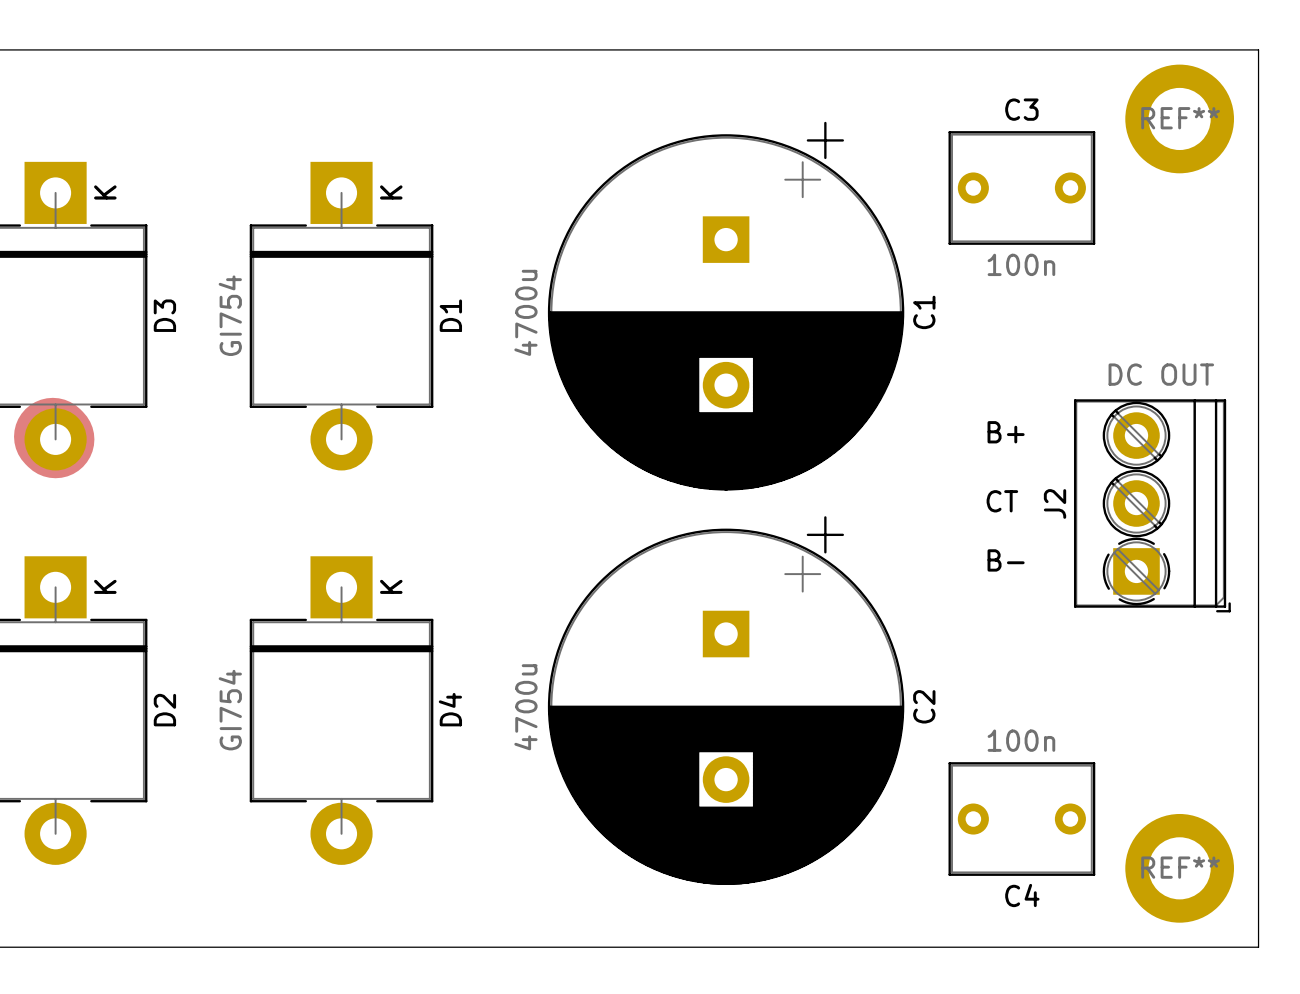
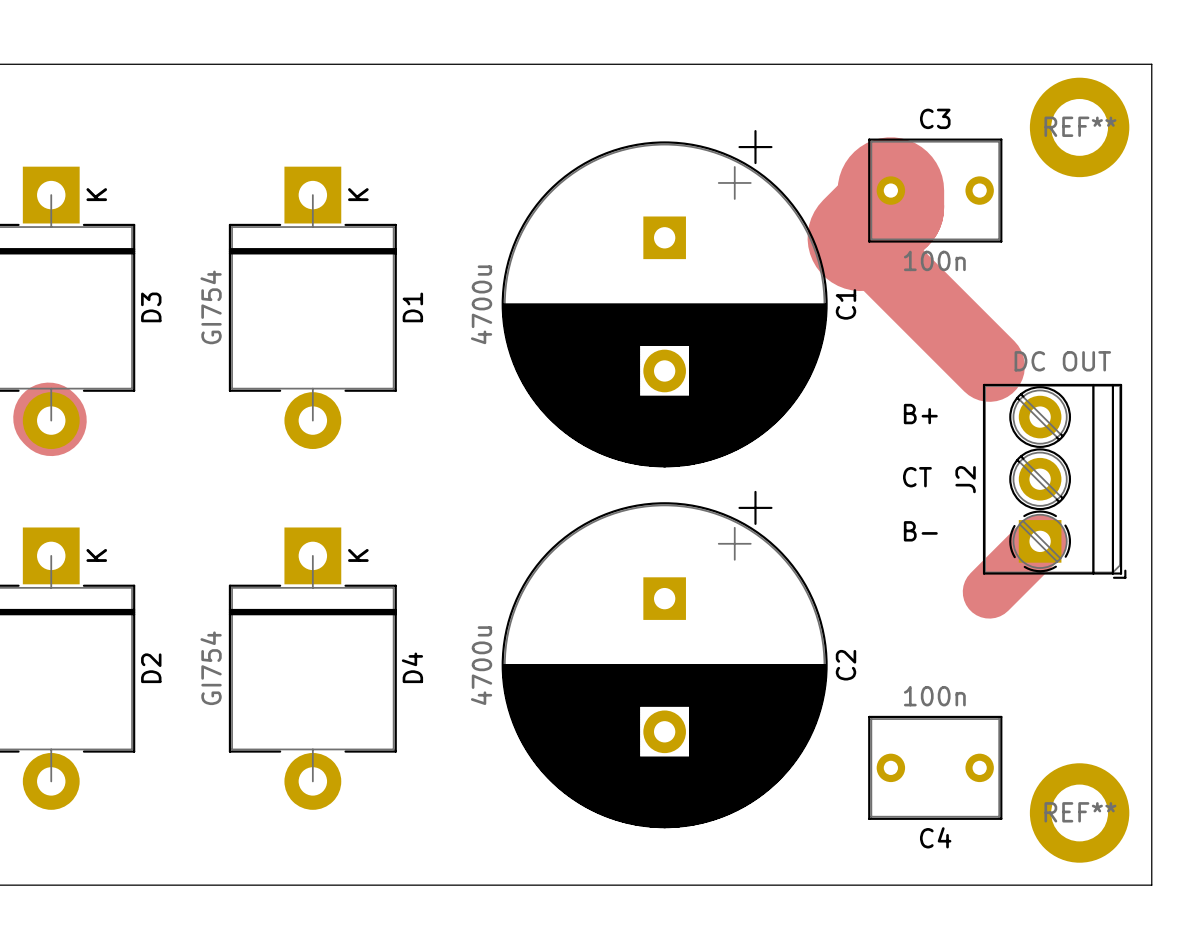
top track: none -> (890, 190) (890, 207) (860, 237) (989, 366)
top track: none -> (1040, 541) (989, 591)

